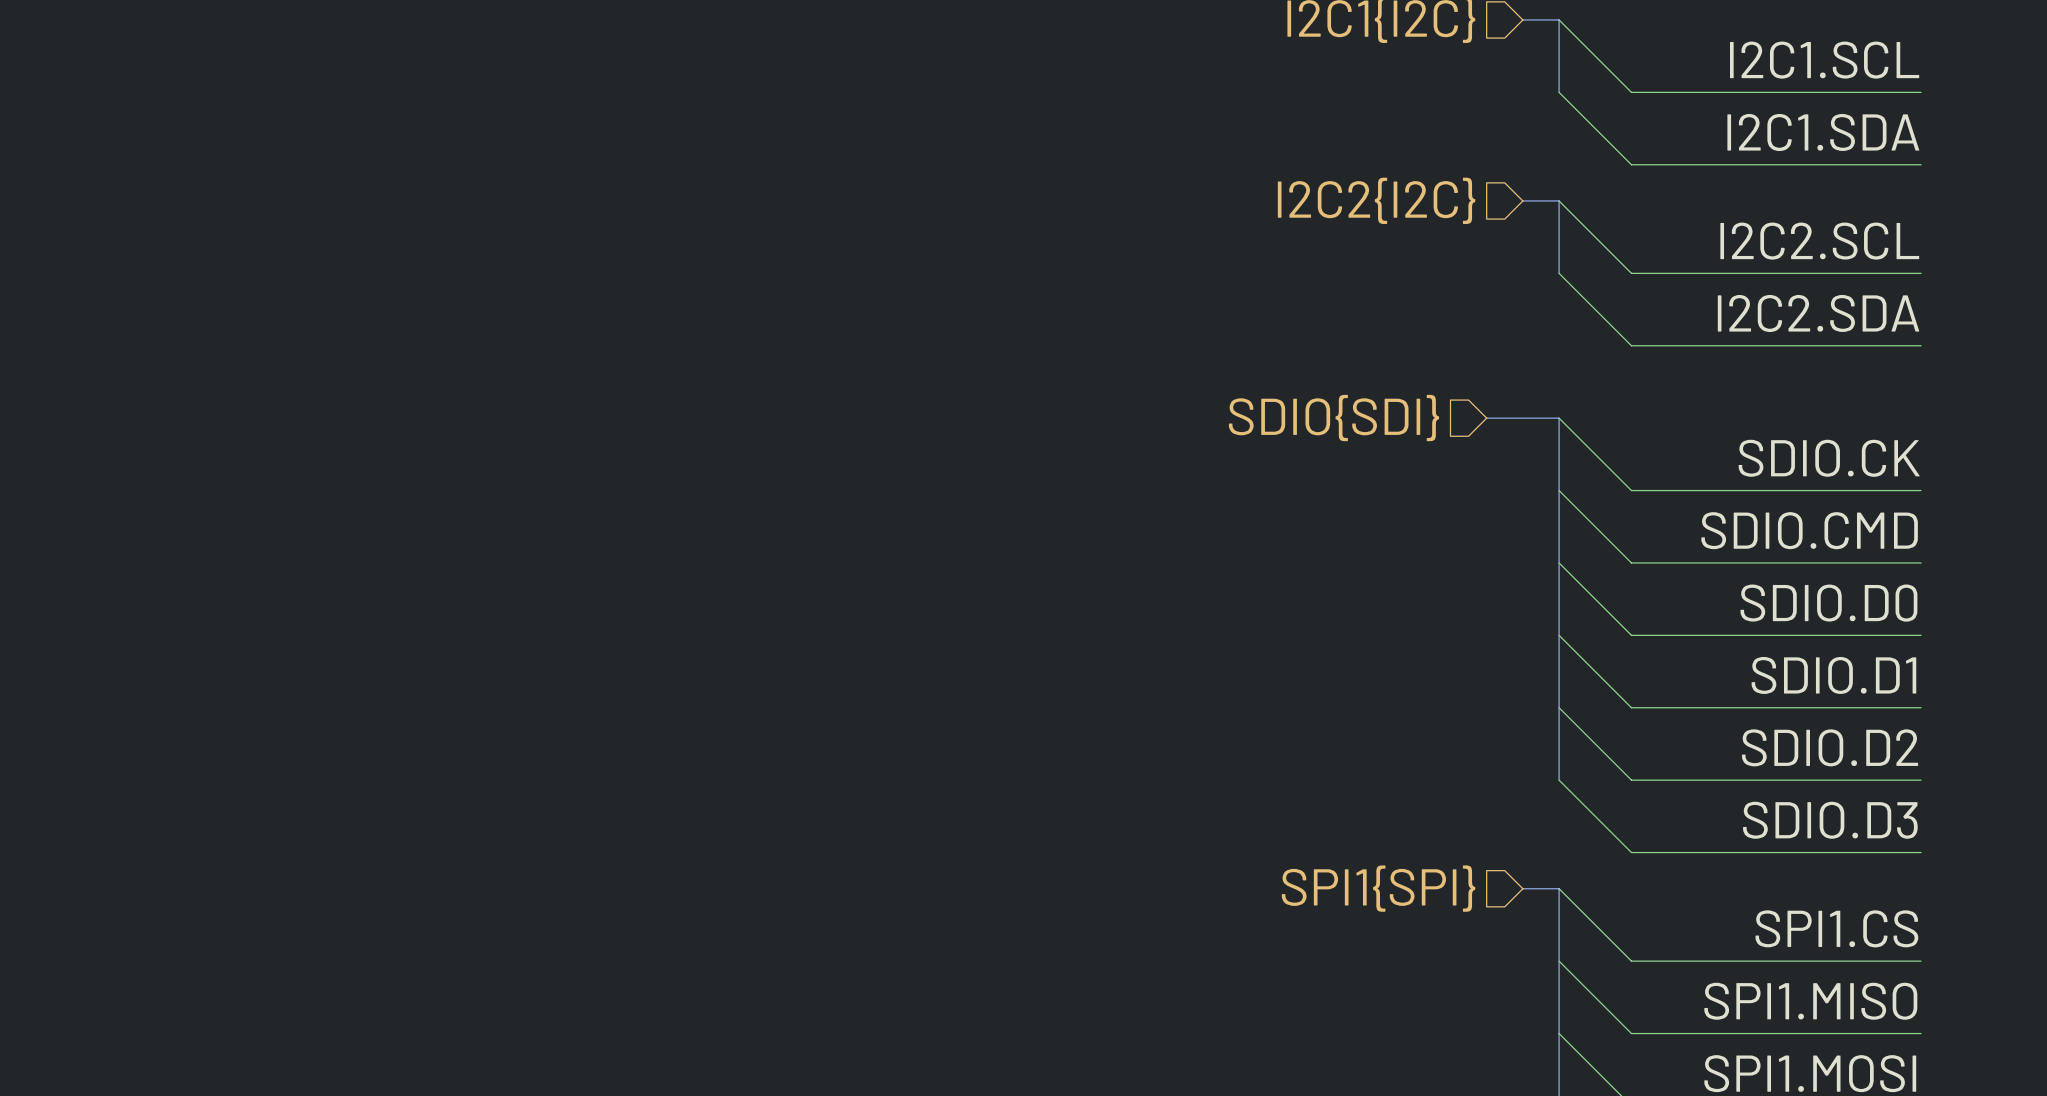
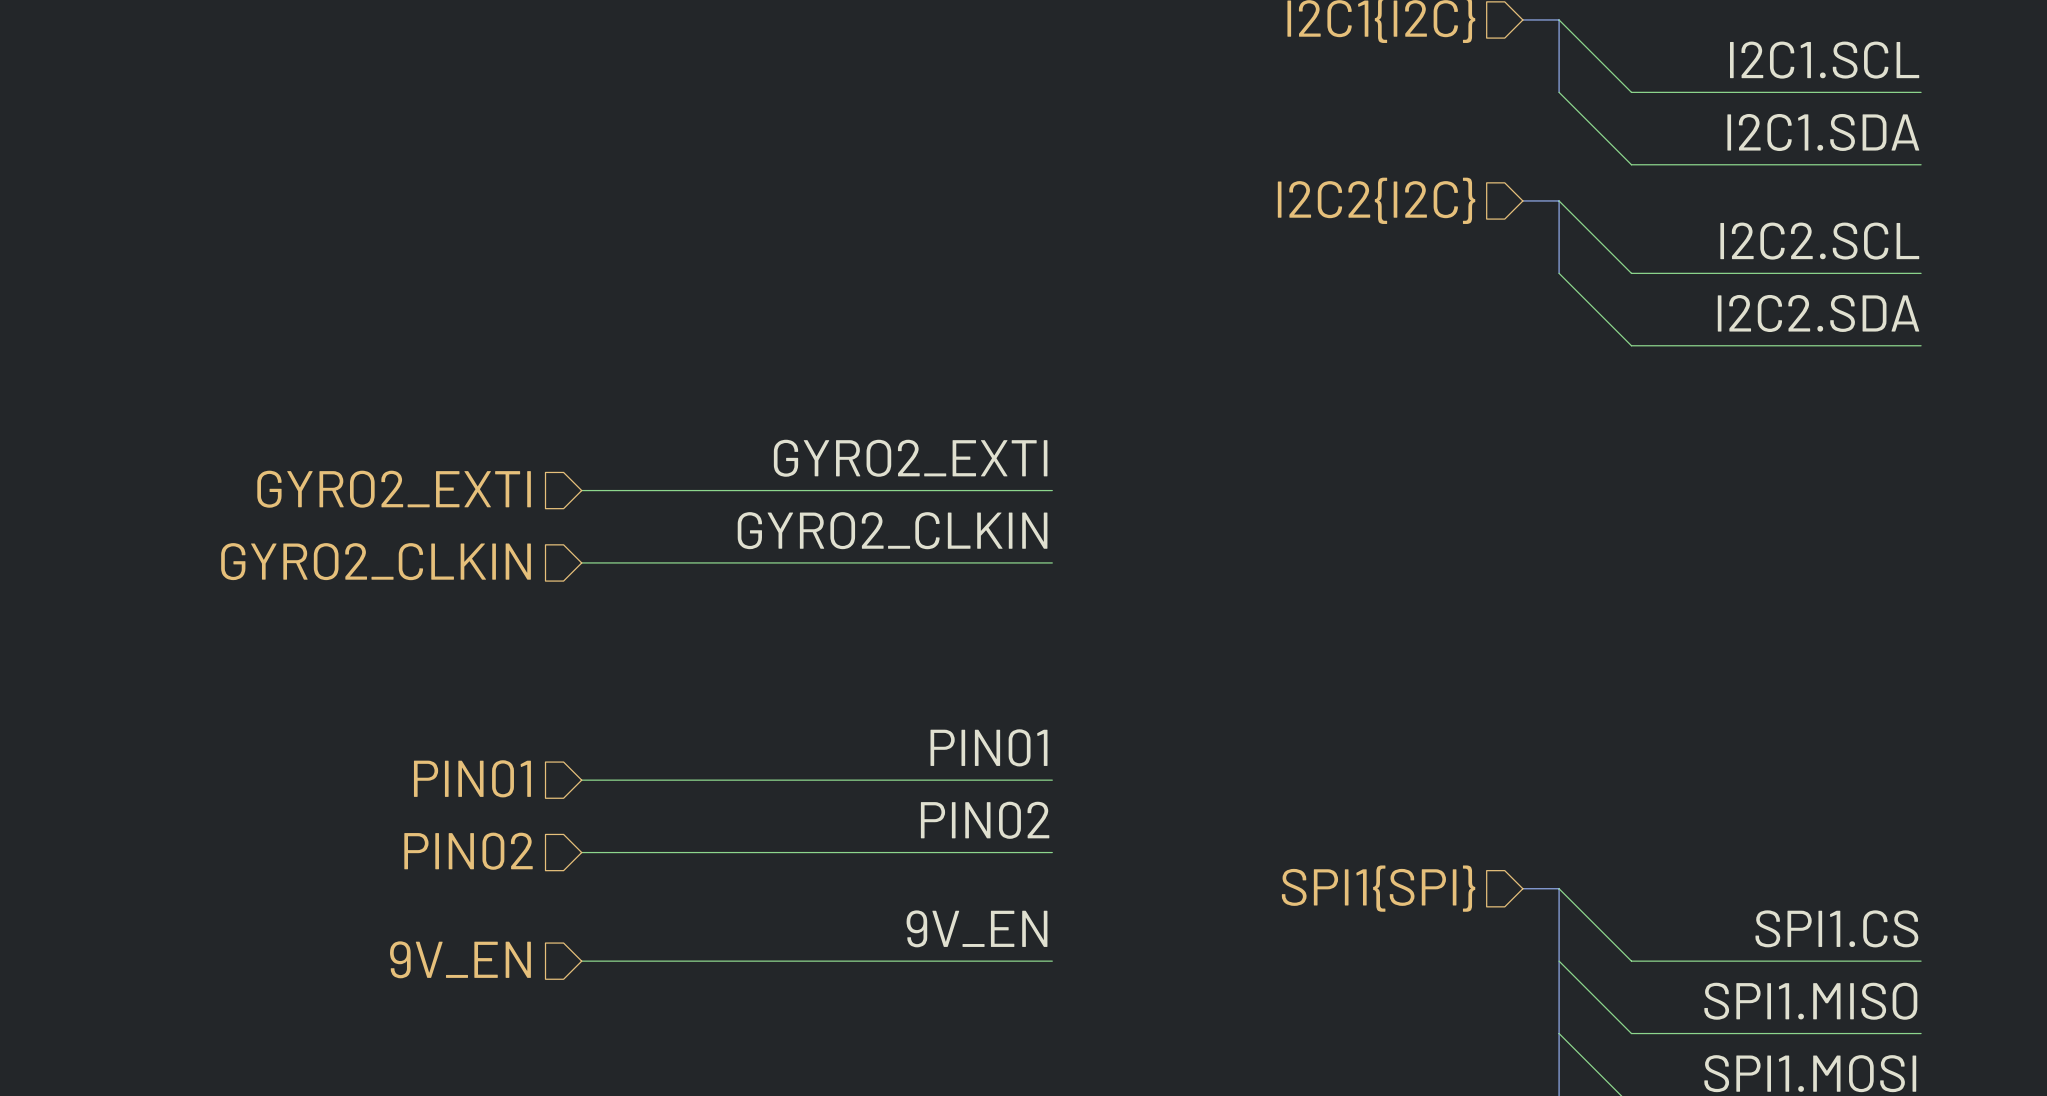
hierarchical label: SDIO{SDI} (1333, 418) -> none
bus: (1486, 418) (1559, 418) (1559, 780) -> none
wire: (1559, 418) (1631, 490) (1921, 490) -> none
label: none -> GYRO2_EXTI (910, 458)
label: SDIO.CK (1829, 458) -> none
hierarchical label: none -> GYRO2_EXTI (394, 489)
wire: none -> (581, 490) (1052, 490)
wire: (1559, 490) (1631, 562) (1921, 562) -> none
label: none -> GYRO2_CLKIN (892, 530)
label: SDIO.CMD (1809, 530) -> none
hierarchical label: none -> GYRO2_CLKIN (376, 561)
wire: none -> (581, 562) (1052, 562)
wire: (1559, 562) (1631, 635) (1921, 635) -> none
label: SDIO.D0 (1828, 603) -> none
wire: (1559, 635) (1631, 707) (1921, 707) -> none
label: SDIO.D1 (1833, 675) -> none
wire: (1559, 707) (1631, 780) (1921, 780) -> none
label: none -> PIN01 (989, 747)
label: SDIO.D2 (1830, 747) -> none
hierarchical label: none -> PIN01 (472, 778)
wire: none -> (581, 780) (1052, 780)
wire: (1559, 780) (1631, 852) (1921, 852) -> none
label: none -> PIN02 (985, 820)
label: SDIO.D3 (1830, 820) -> none
hierarchical label: none -> PIN02 (468, 851)
wire: none -> (581, 852) (1052, 852)
label: none -> 9V_EN (977, 928)
hierarchical label: none -> 9V_EN (460, 959)
wire: none -> (581, 961) (1052, 961)

